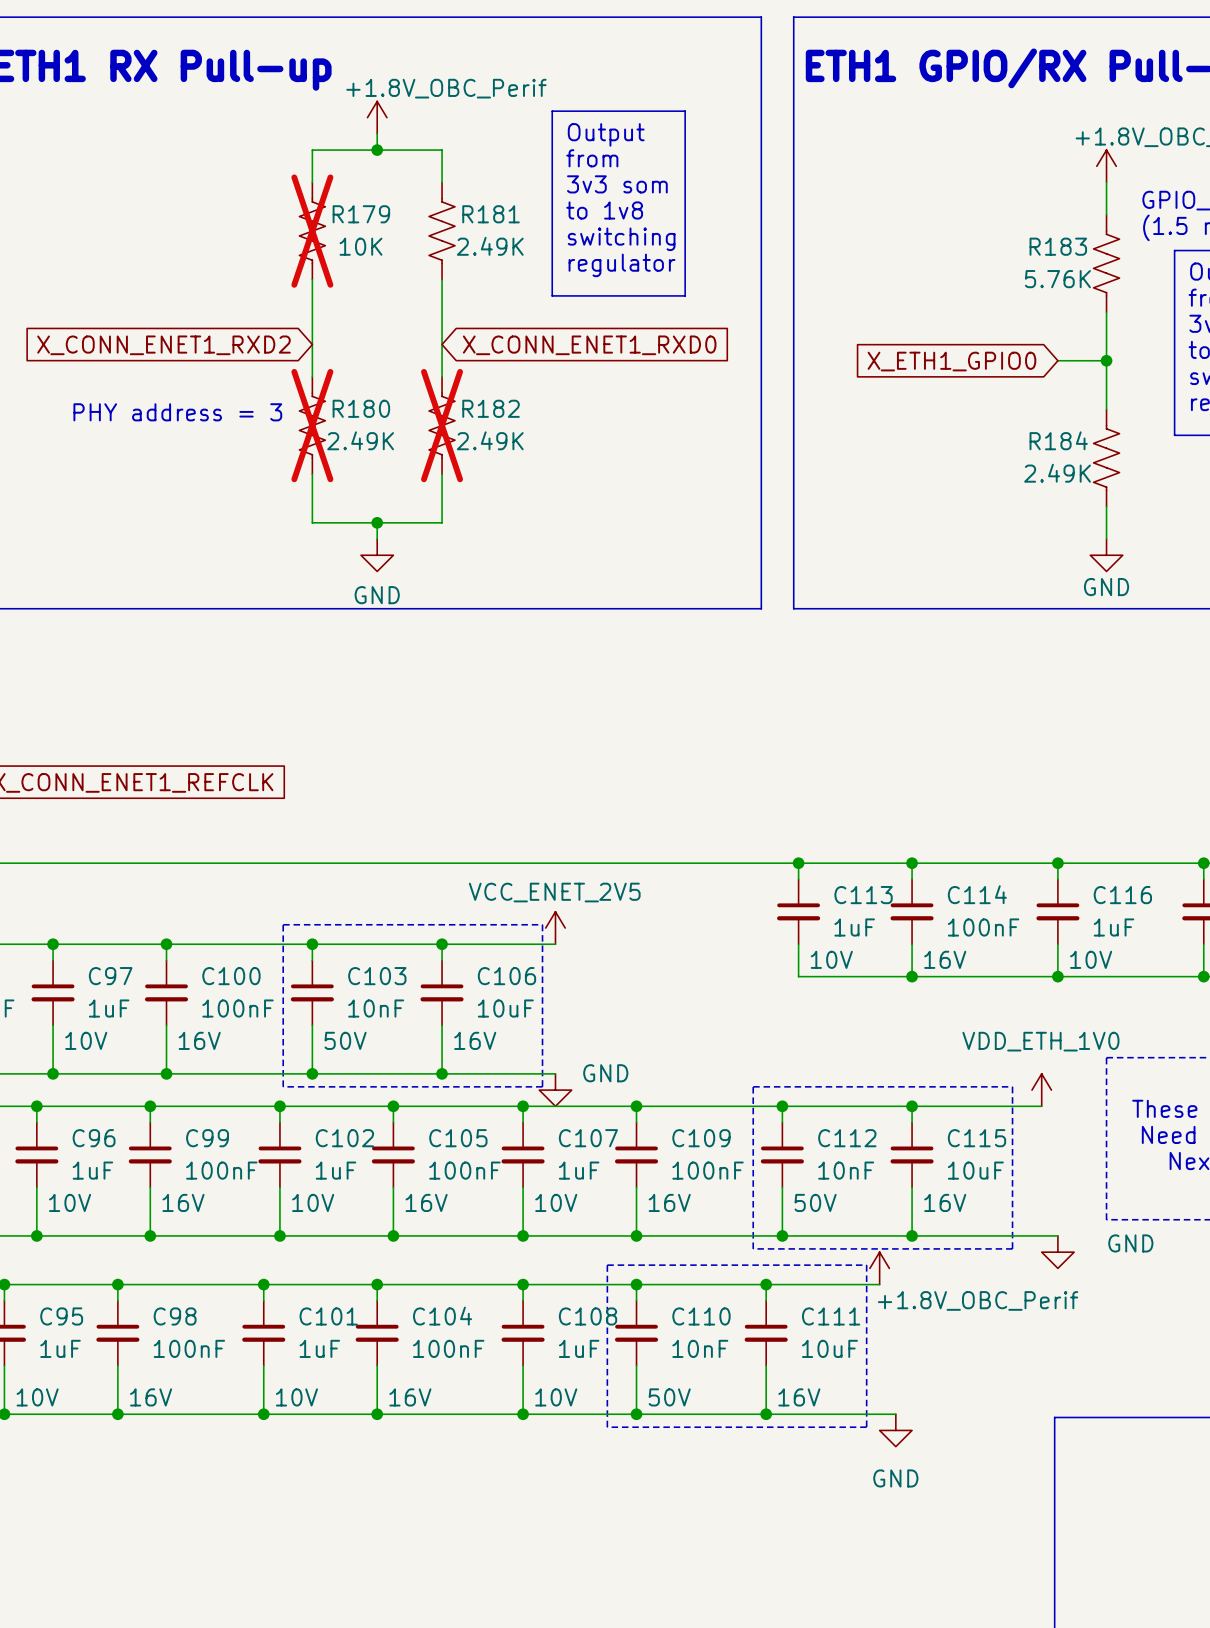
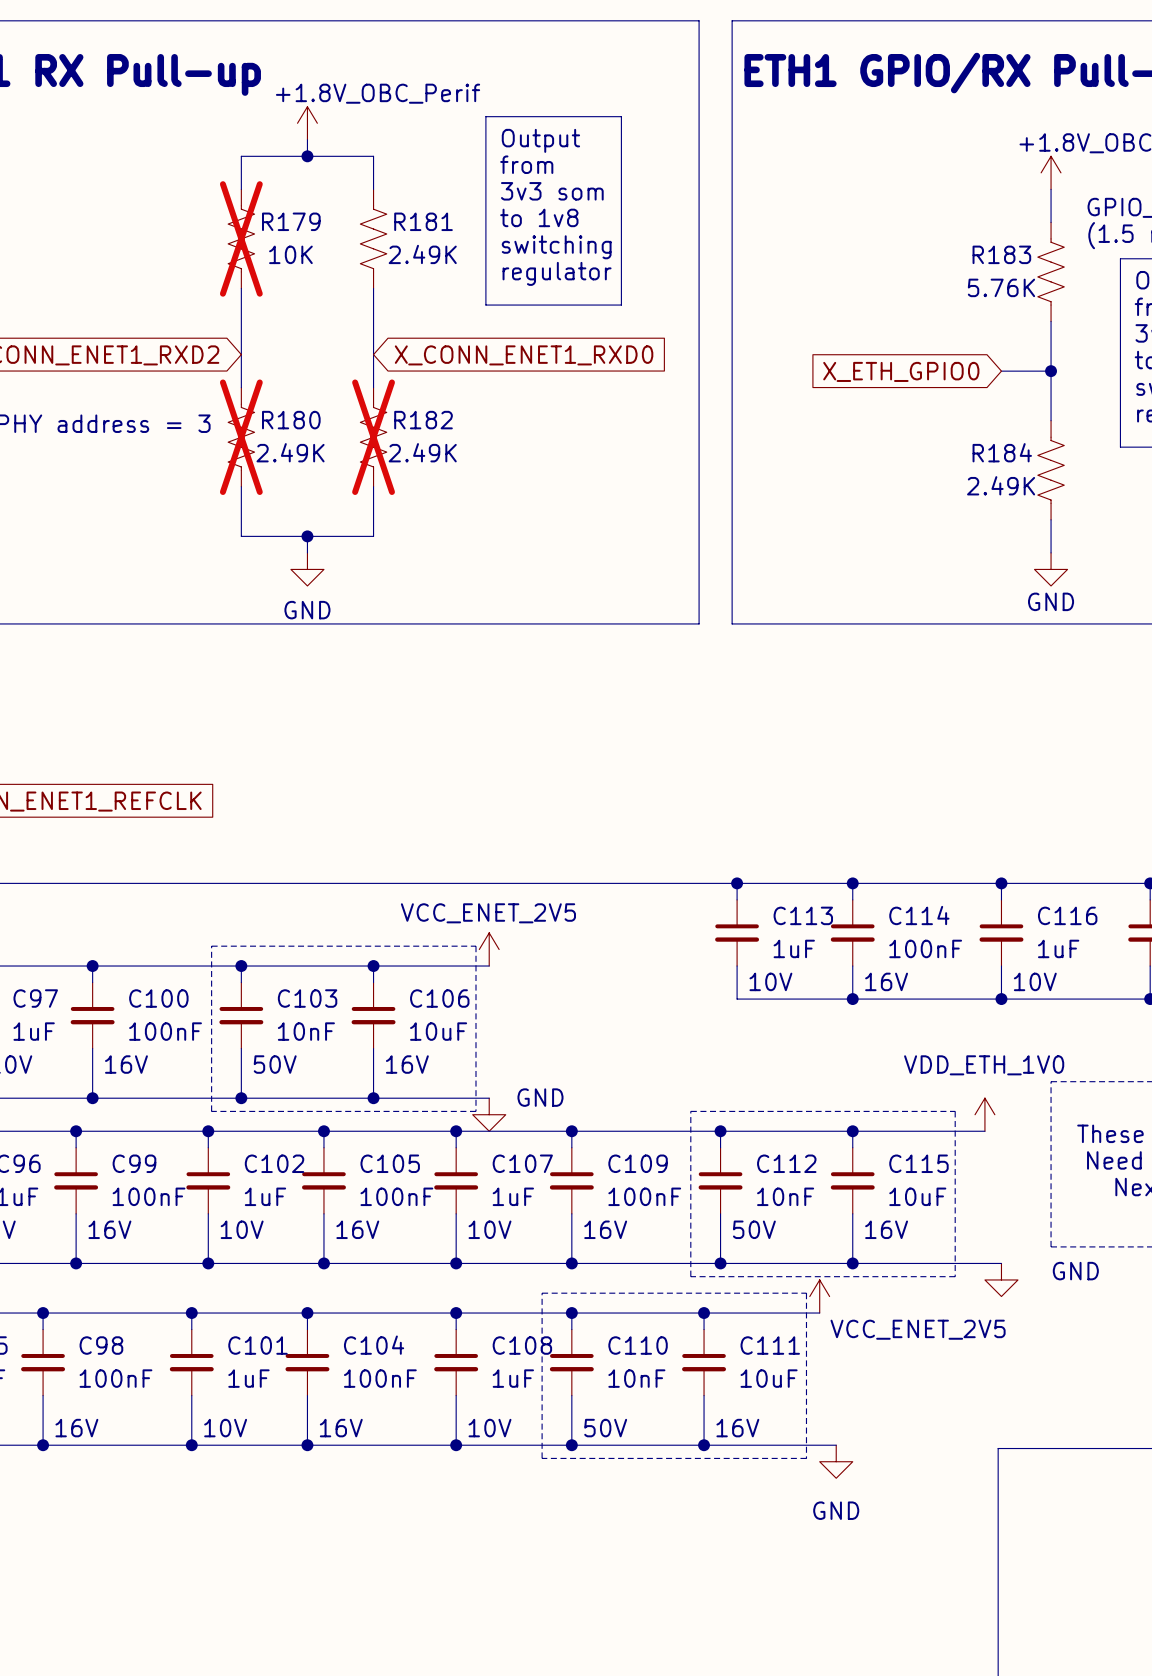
global label: X_ETH1_GPIO0 (951, 361) -> X_ETH_GPIO0 (901, 371)
power symbol: +1.8V_OBC_Perif (879, 1268) -> VCC_ENET_2V5 (819, 1296)

